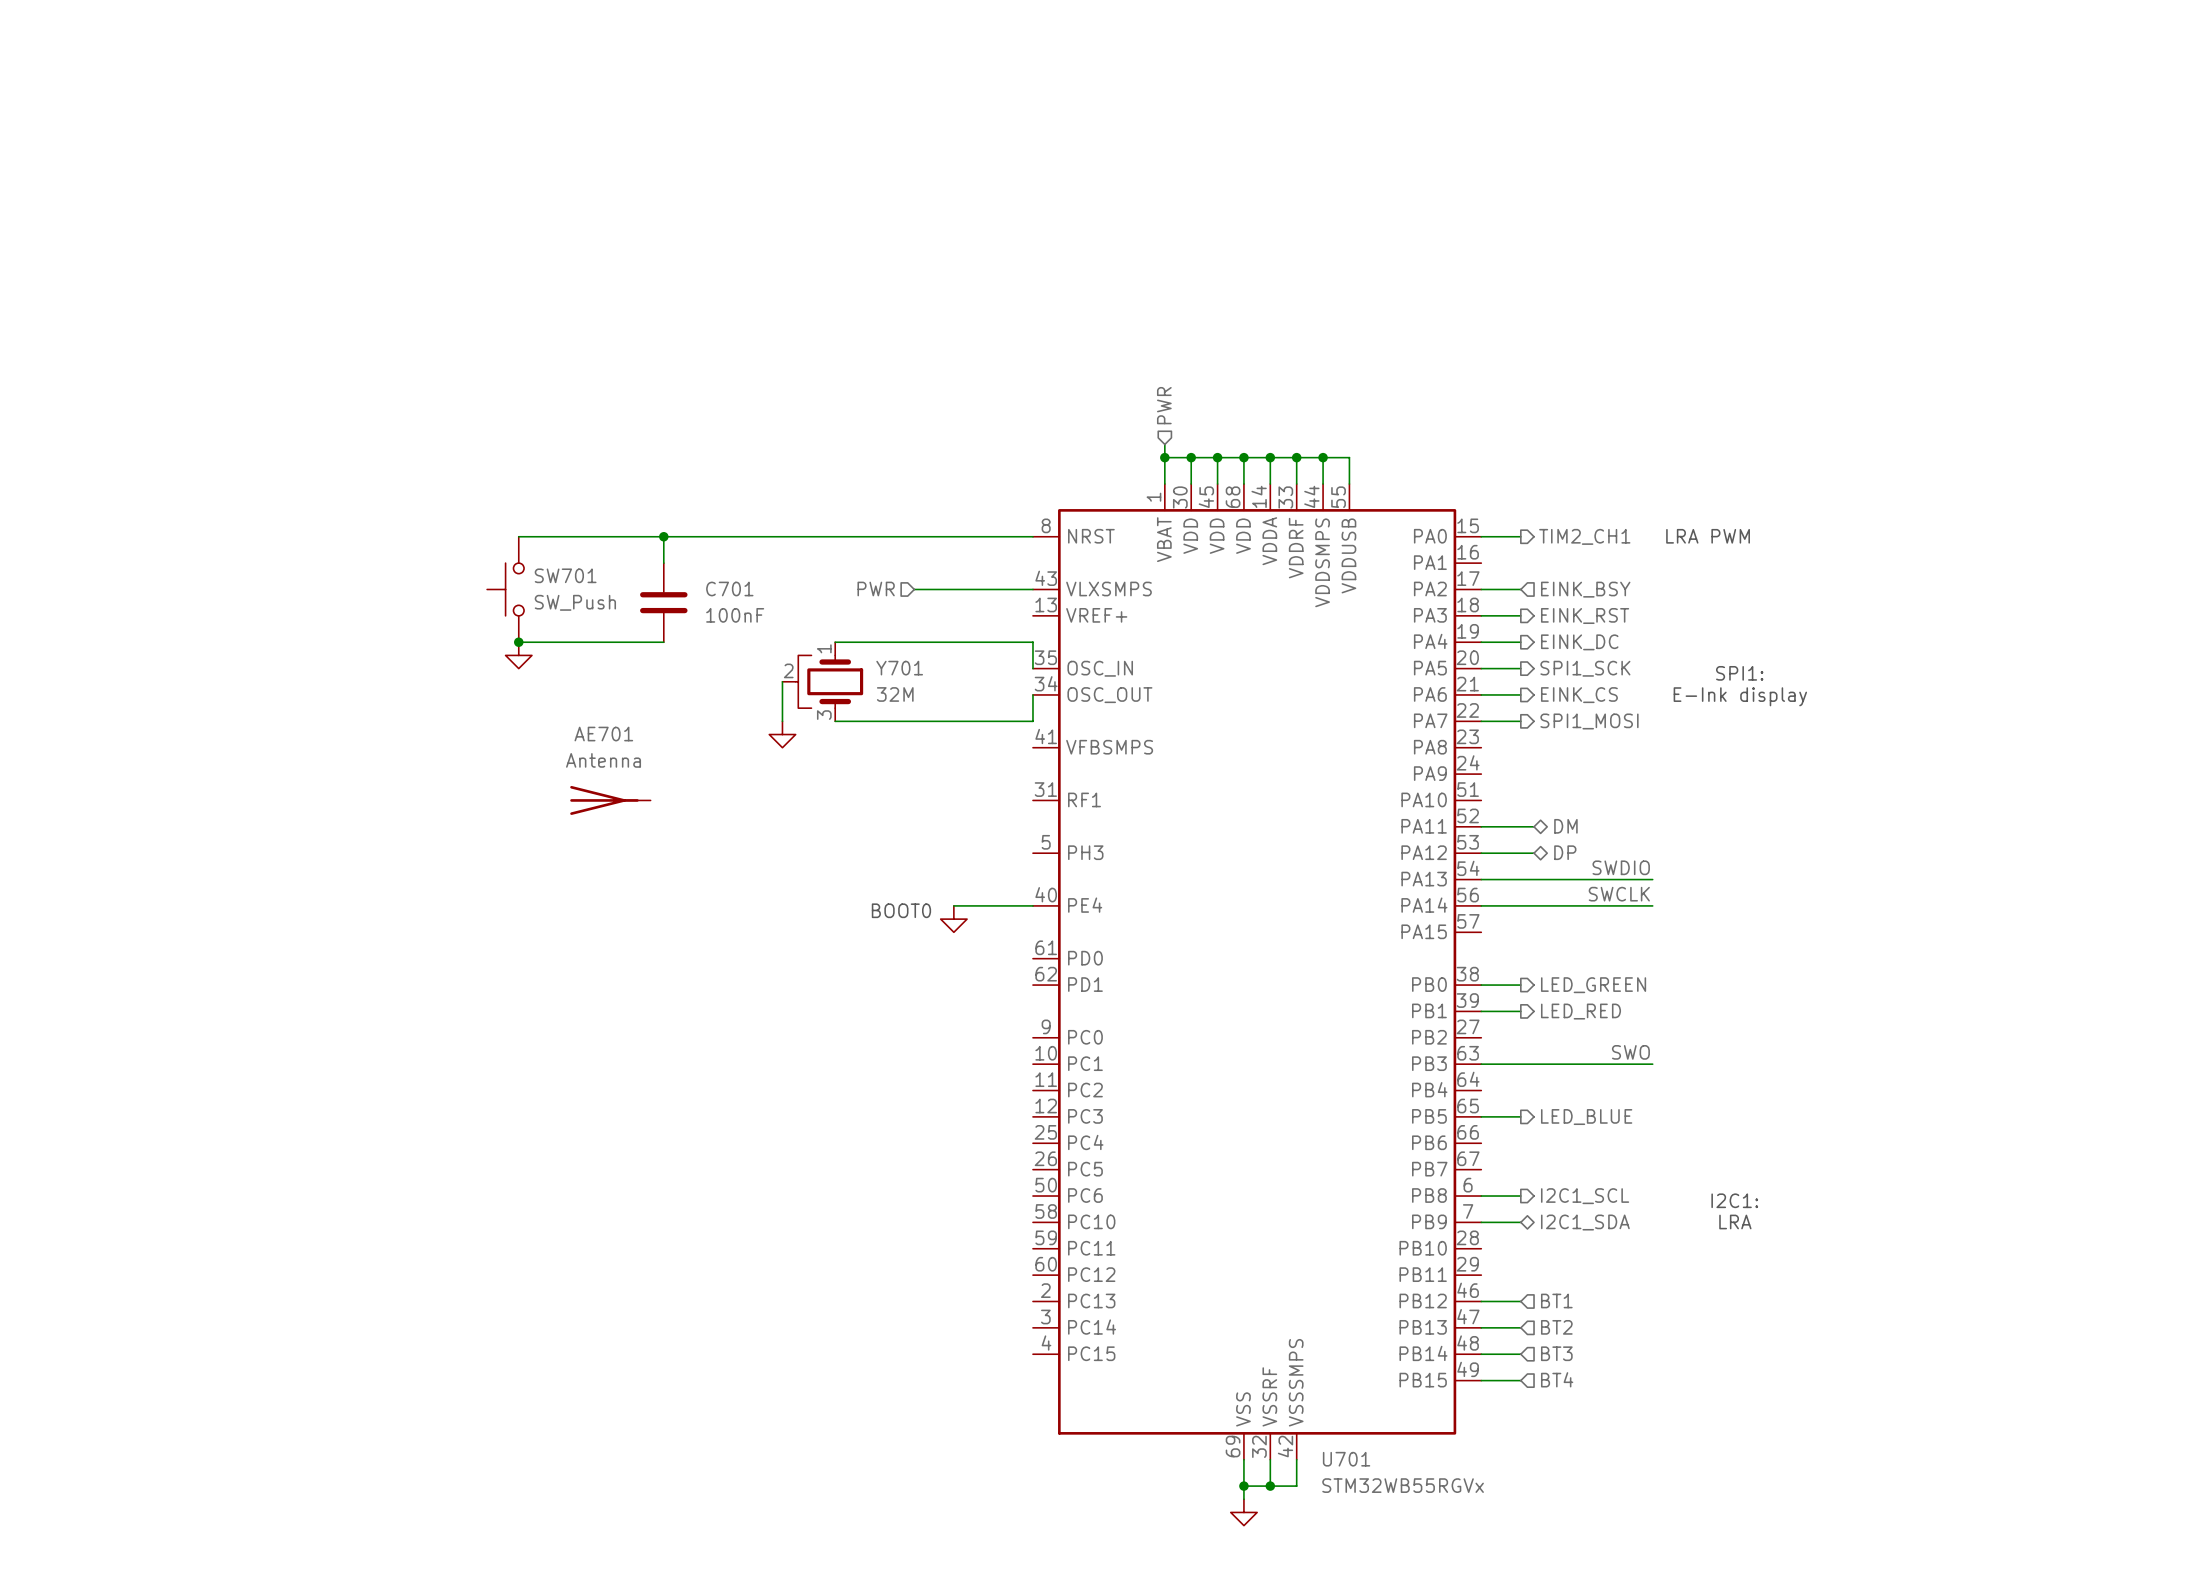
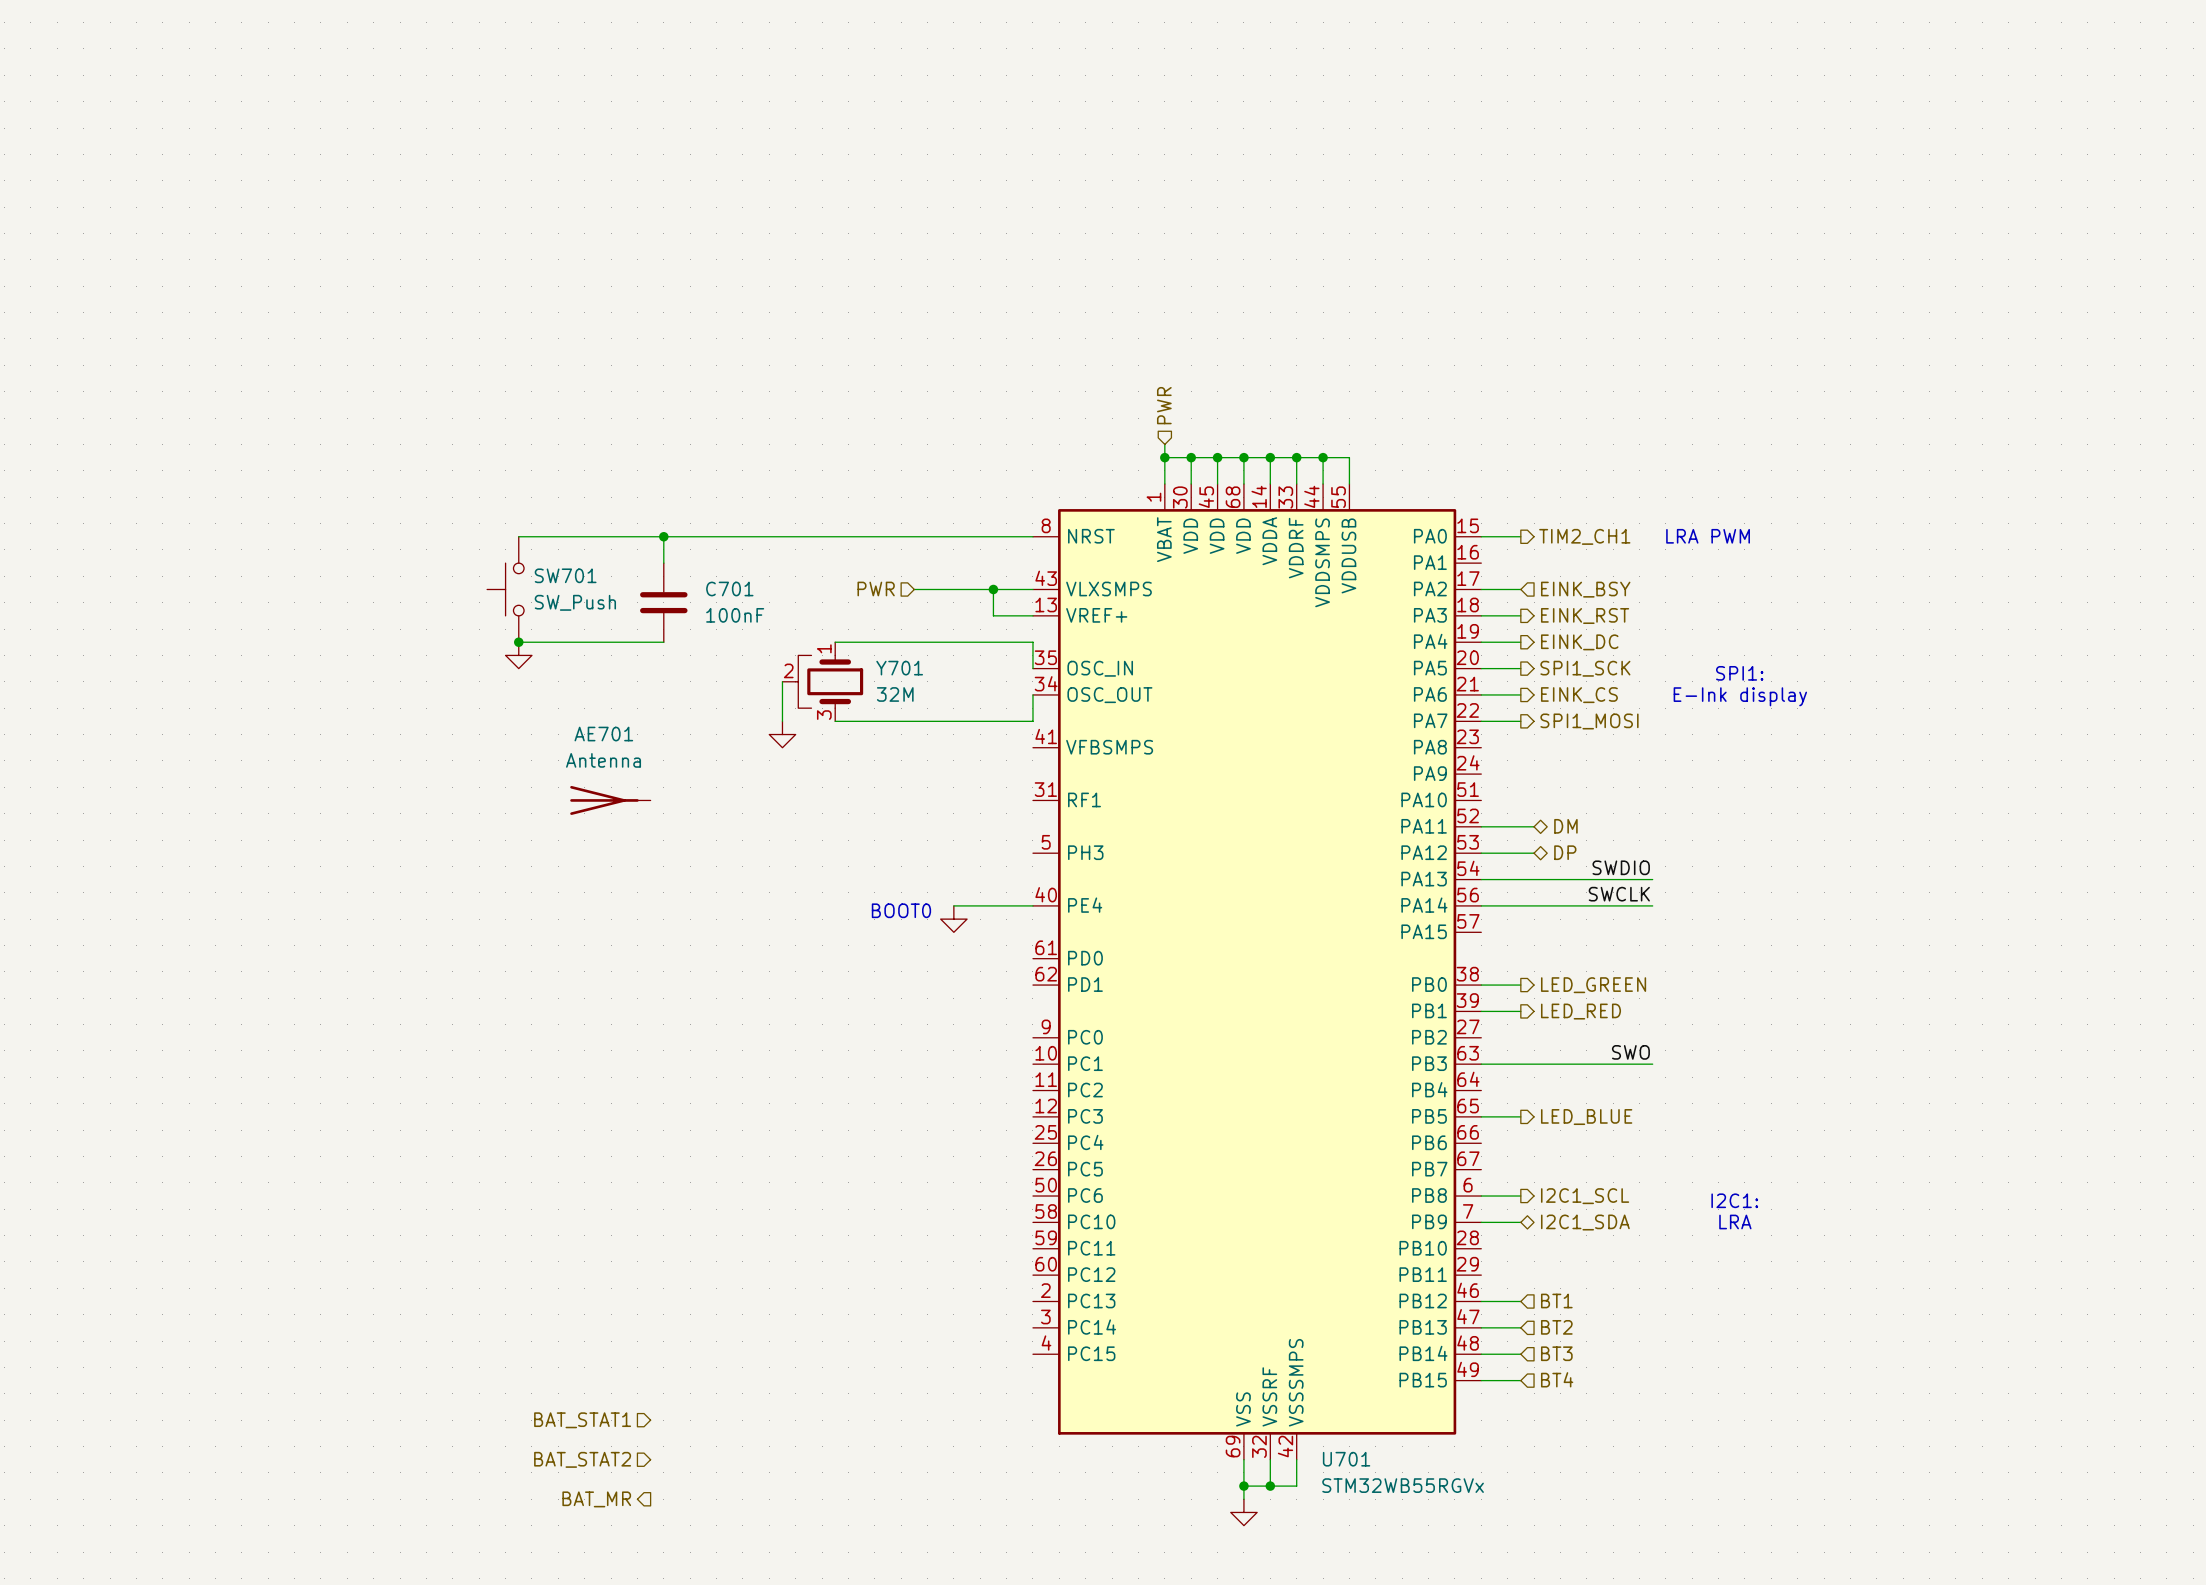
wire: none -> (993, 589) (993, 615) (1032, 615)
junction: none -> (993, 589)
hierarchical label: none -> BAT_STAT1 (582, 1420)
hierarchical label: none -> BAT_STAT2 (582, 1459)
hierarchical label: none -> BAT_MR (596, 1499)

